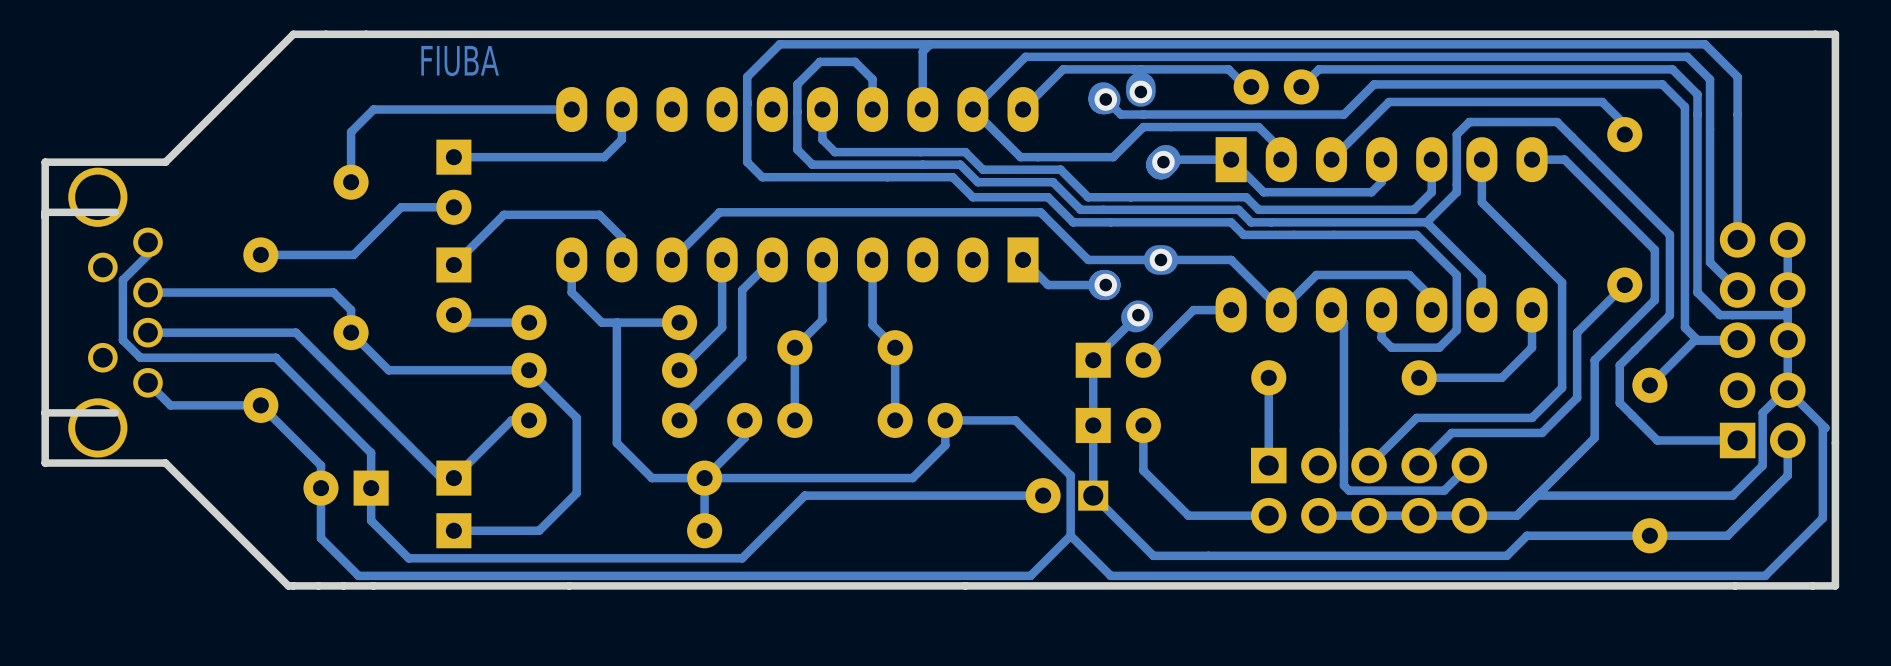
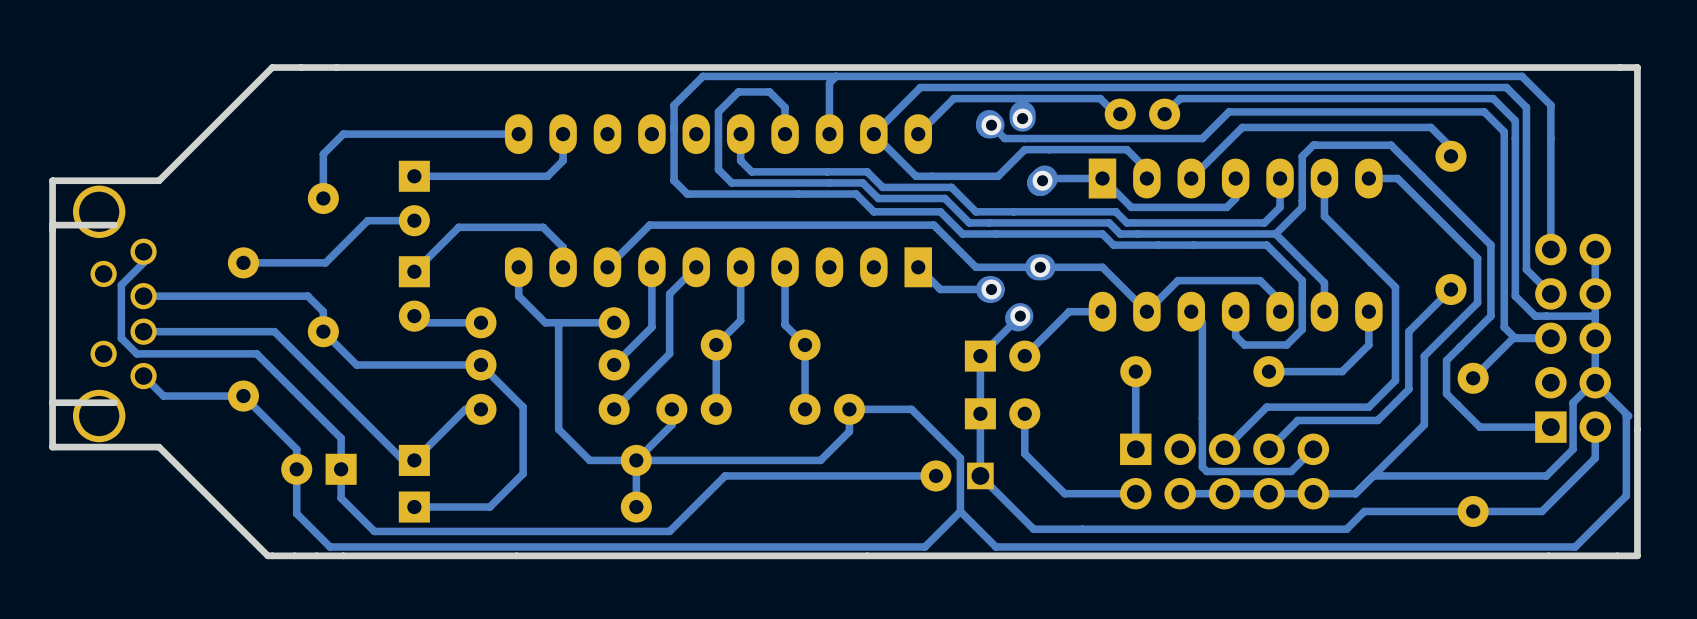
text: FIUBA (460, 61) -> none

